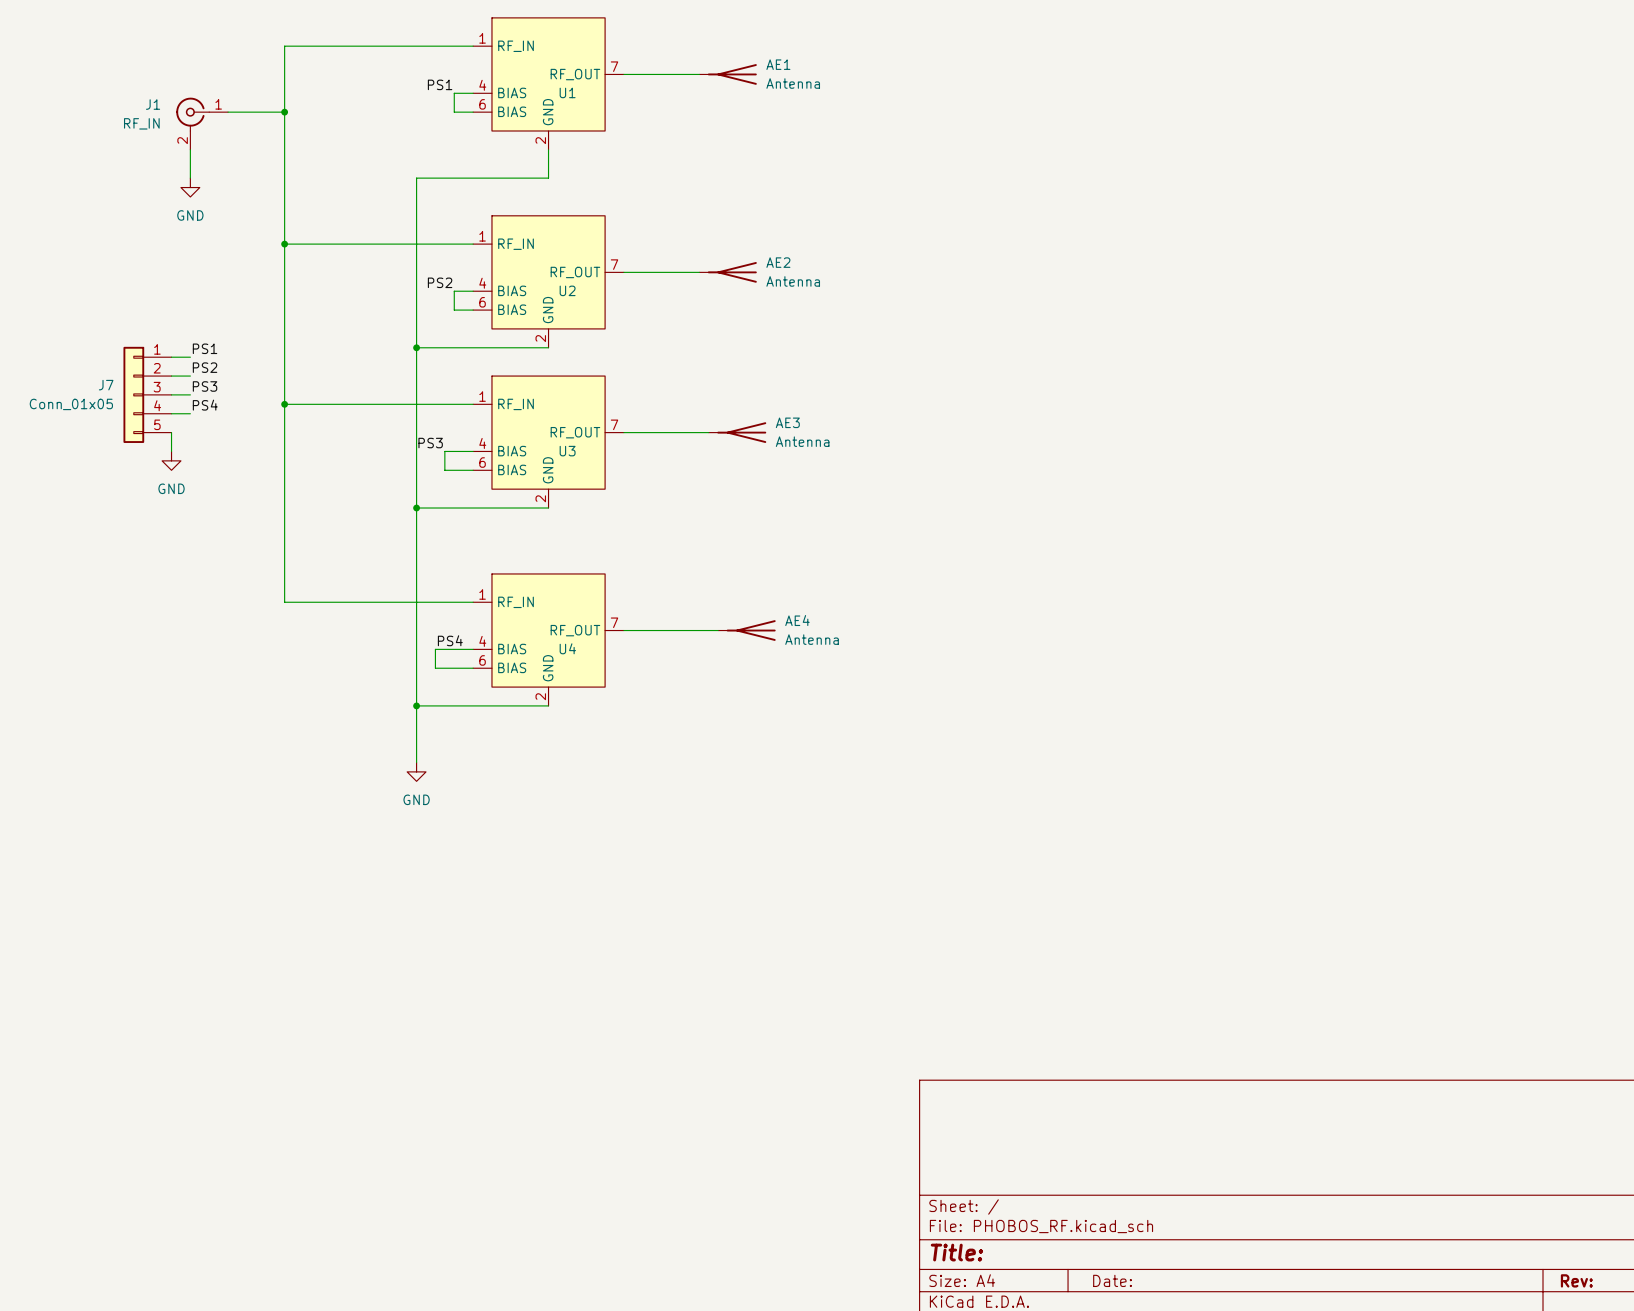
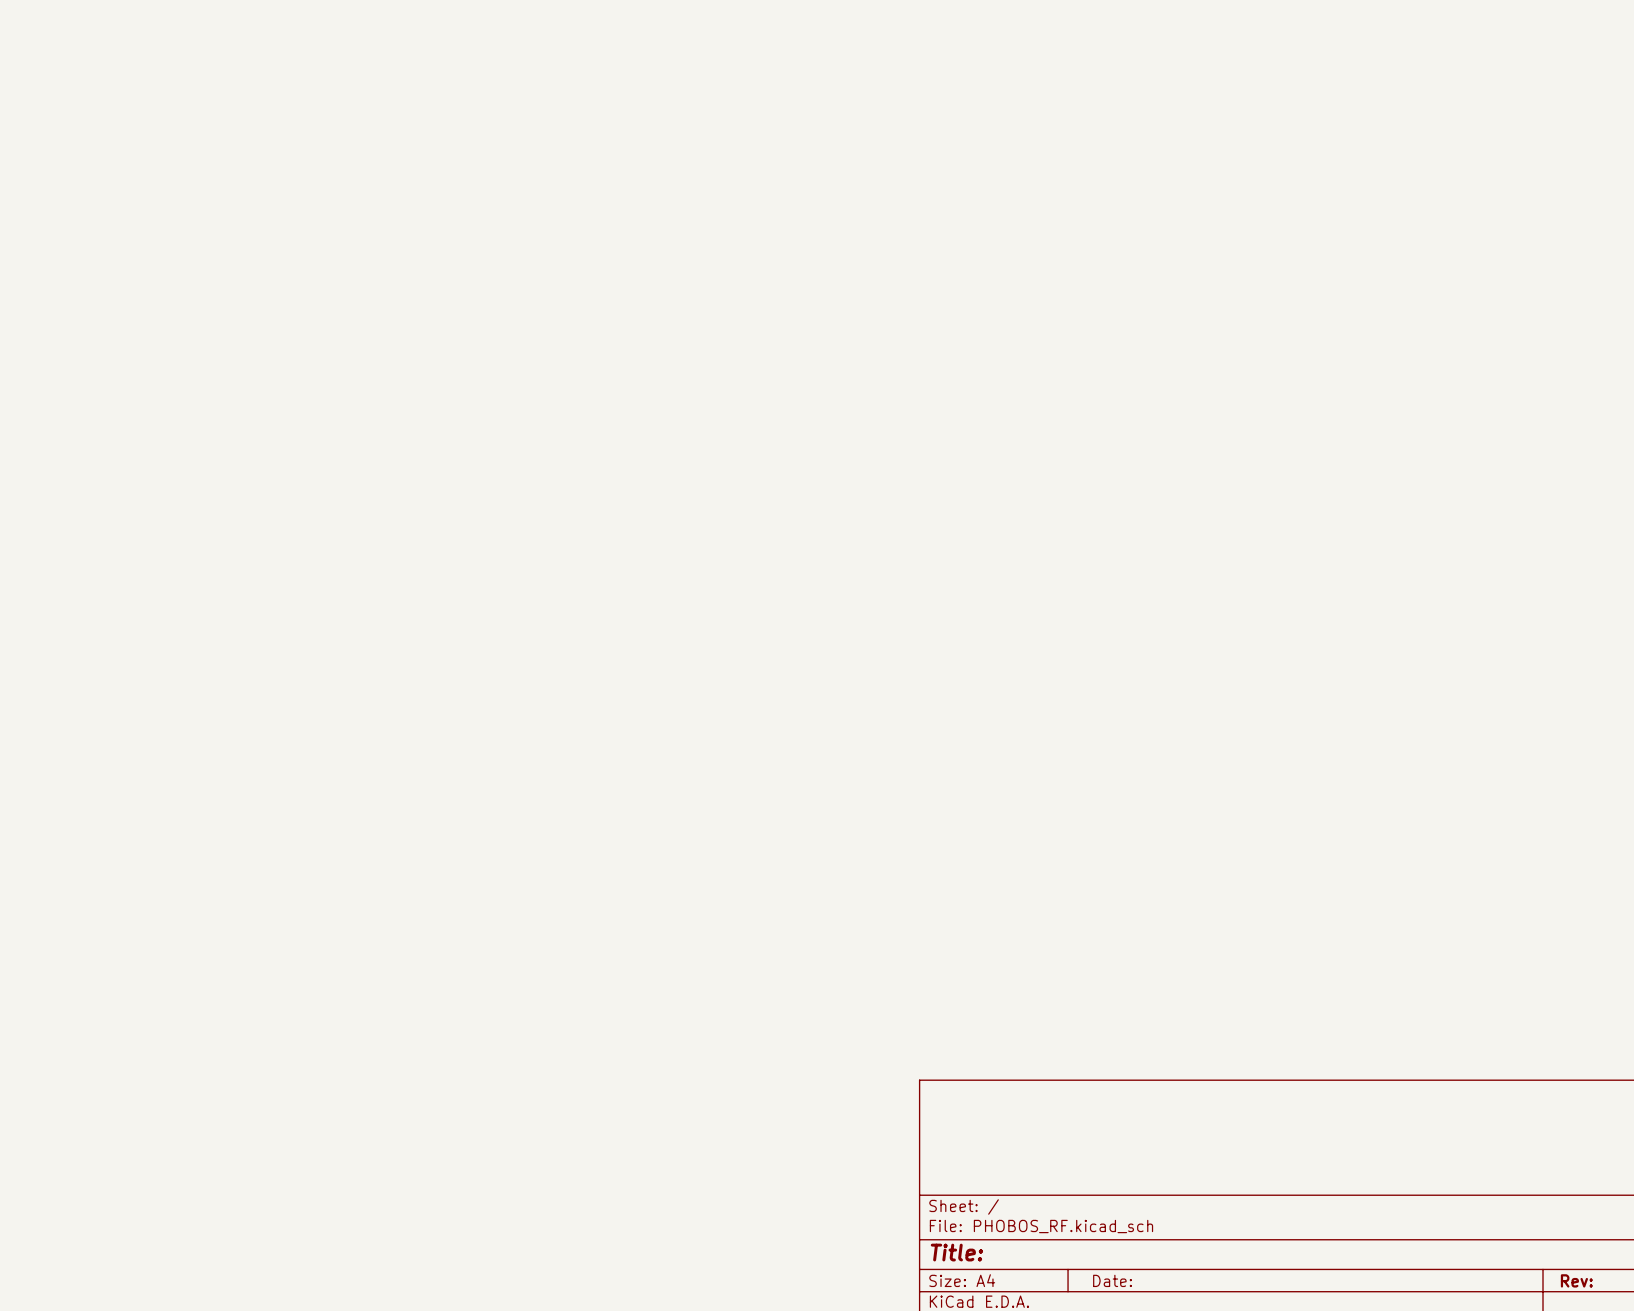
wire: (473, 46) (284, 46) (284, 602) (473, 602) -> none
wire: (623, 74) (699, 74) -> none
AE1: Antenna (728, 74) -> none
U1: (548, 83) -> none
label: PS1 (440, 84) -> none
wire: (473, 93) (454, 93) (454, 112) (473, 112) -> none
wire: (228, 112) (284, 112) -> none
junction: (284, 112) -> none
J1: RF_IN (202, 123) -> none
wire: (190, 149) (190, 178) -> none
wire: (548, 149) (548, 178) (416, 178) (416, 762) -> none
power symbol: GND (190, 187) -> none
wire: (284, 244) (473, 244) -> none
junction: (284, 244) -> none
wire: (623, 272) (699, 272) -> none
AE2: Antenna (728, 272) -> none
U2: (548, 281) -> none
label: PS2 (440, 282) -> none
wire: (473, 291) (454, 291) (454, 310) (473, 310) -> none
wire: (416, 347) (548, 347) -> none
junction: (416, 347) -> none
label: PS1 (205, 348) -> none
wire: (171, 357) (190, 357) -> none
label: PS2 (205, 367) -> none
wire: (171, 376) (190, 376) -> none
label: PS3 (205, 386) -> none
J7: Conn_01x05 (147, 394) -> none
wire: (171, 394) (190, 394) -> none
wire: (284, 404) (473, 404) -> none
junction: (284, 404) -> none
label: PS4 (205, 405) -> none
wire: (171, 413) (190, 413) -> none
wire: (171, 432) (171, 451) -> none
wire: (623, 432) (708, 432) -> none
AE3: Antenna (737, 432) -> none
U3: (548, 442) -> none
label: PS3 (430, 443) -> none
wire: (473, 451) (444, 451) (444, 470) (473, 470) -> none
power symbol: GND (171, 460) -> none
wire: (416, 508) (548, 508) -> none
junction: (416, 508) -> none
wire: (623, 630) (718, 630) -> none
AE4: Antenna (746, 630) -> none
U4: (548, 639) -> none
label: PS4 (450, 640) -> none
wire: (473, 649) (435, 649) (435, 668) (473, 668) -> none
wire: (416, 705) (548, 705) -> none
junction: (416, 705) -> none
power symbol: GND (416, 771) -> none

